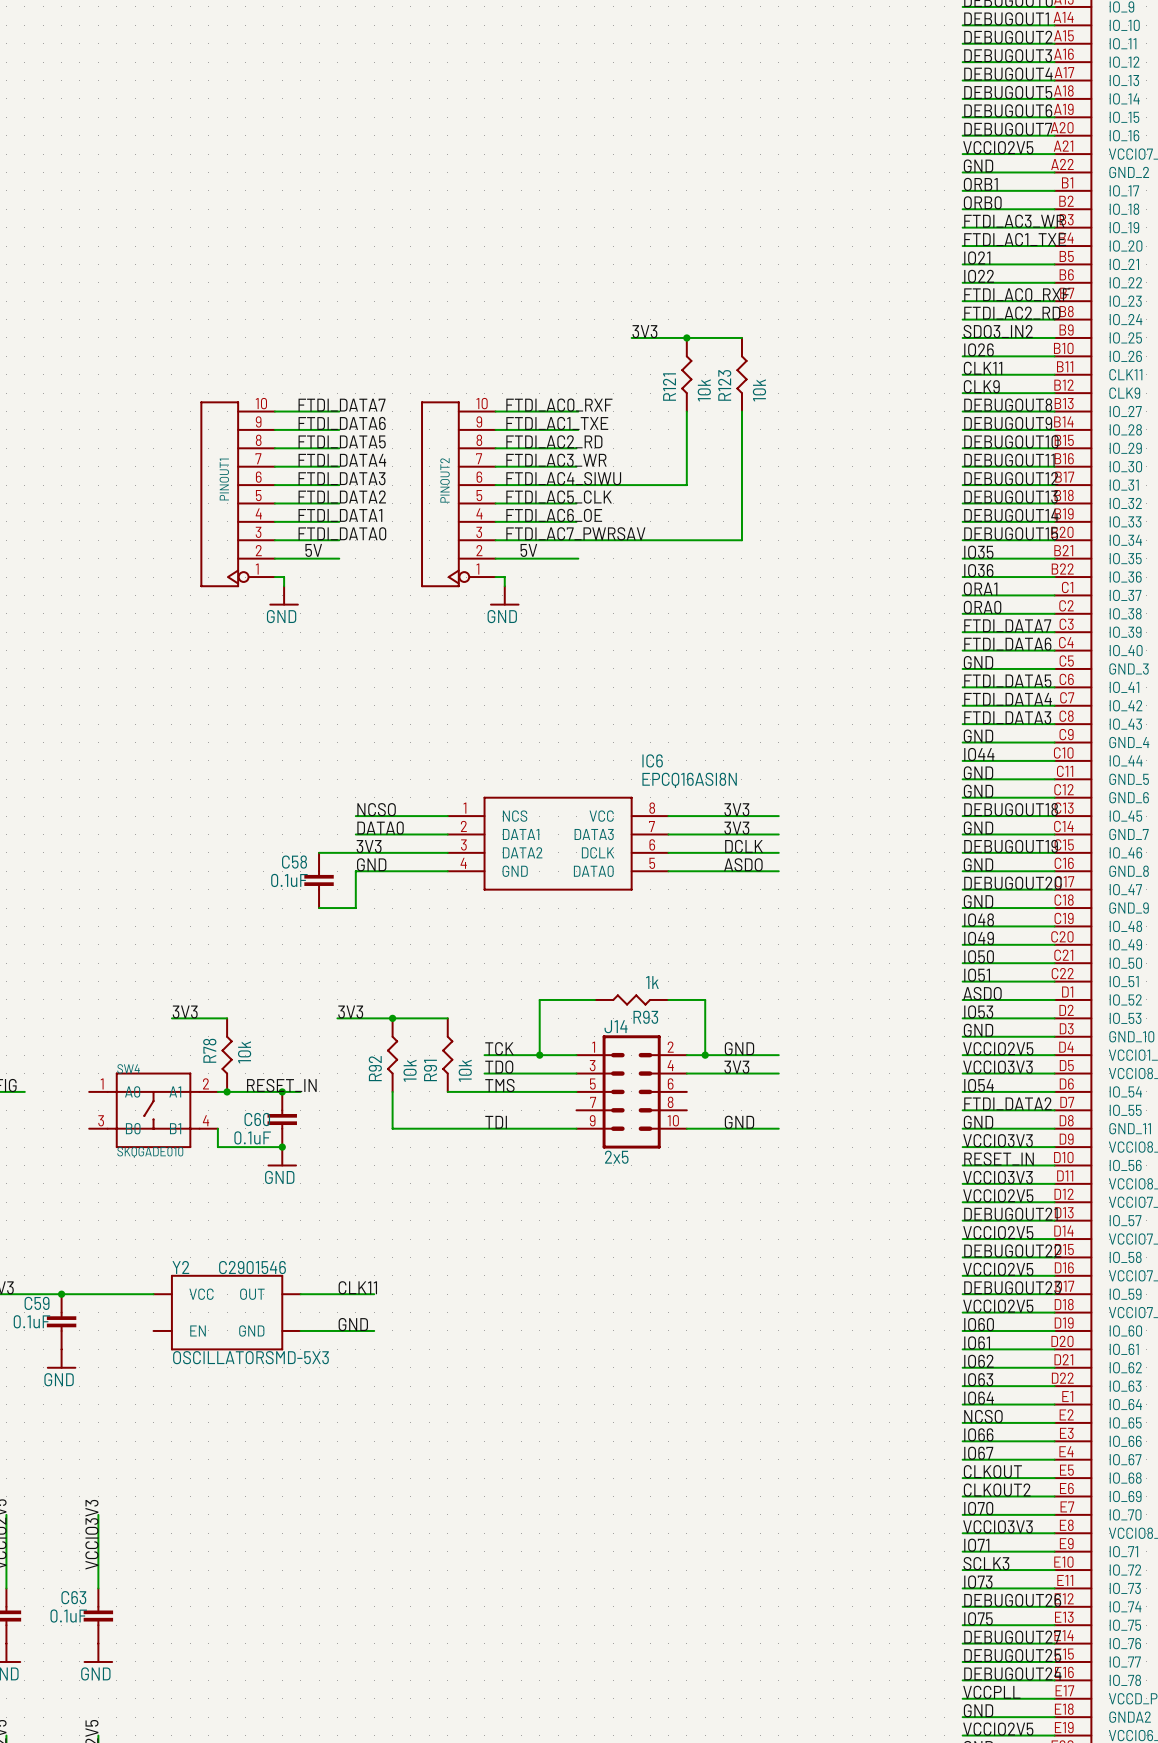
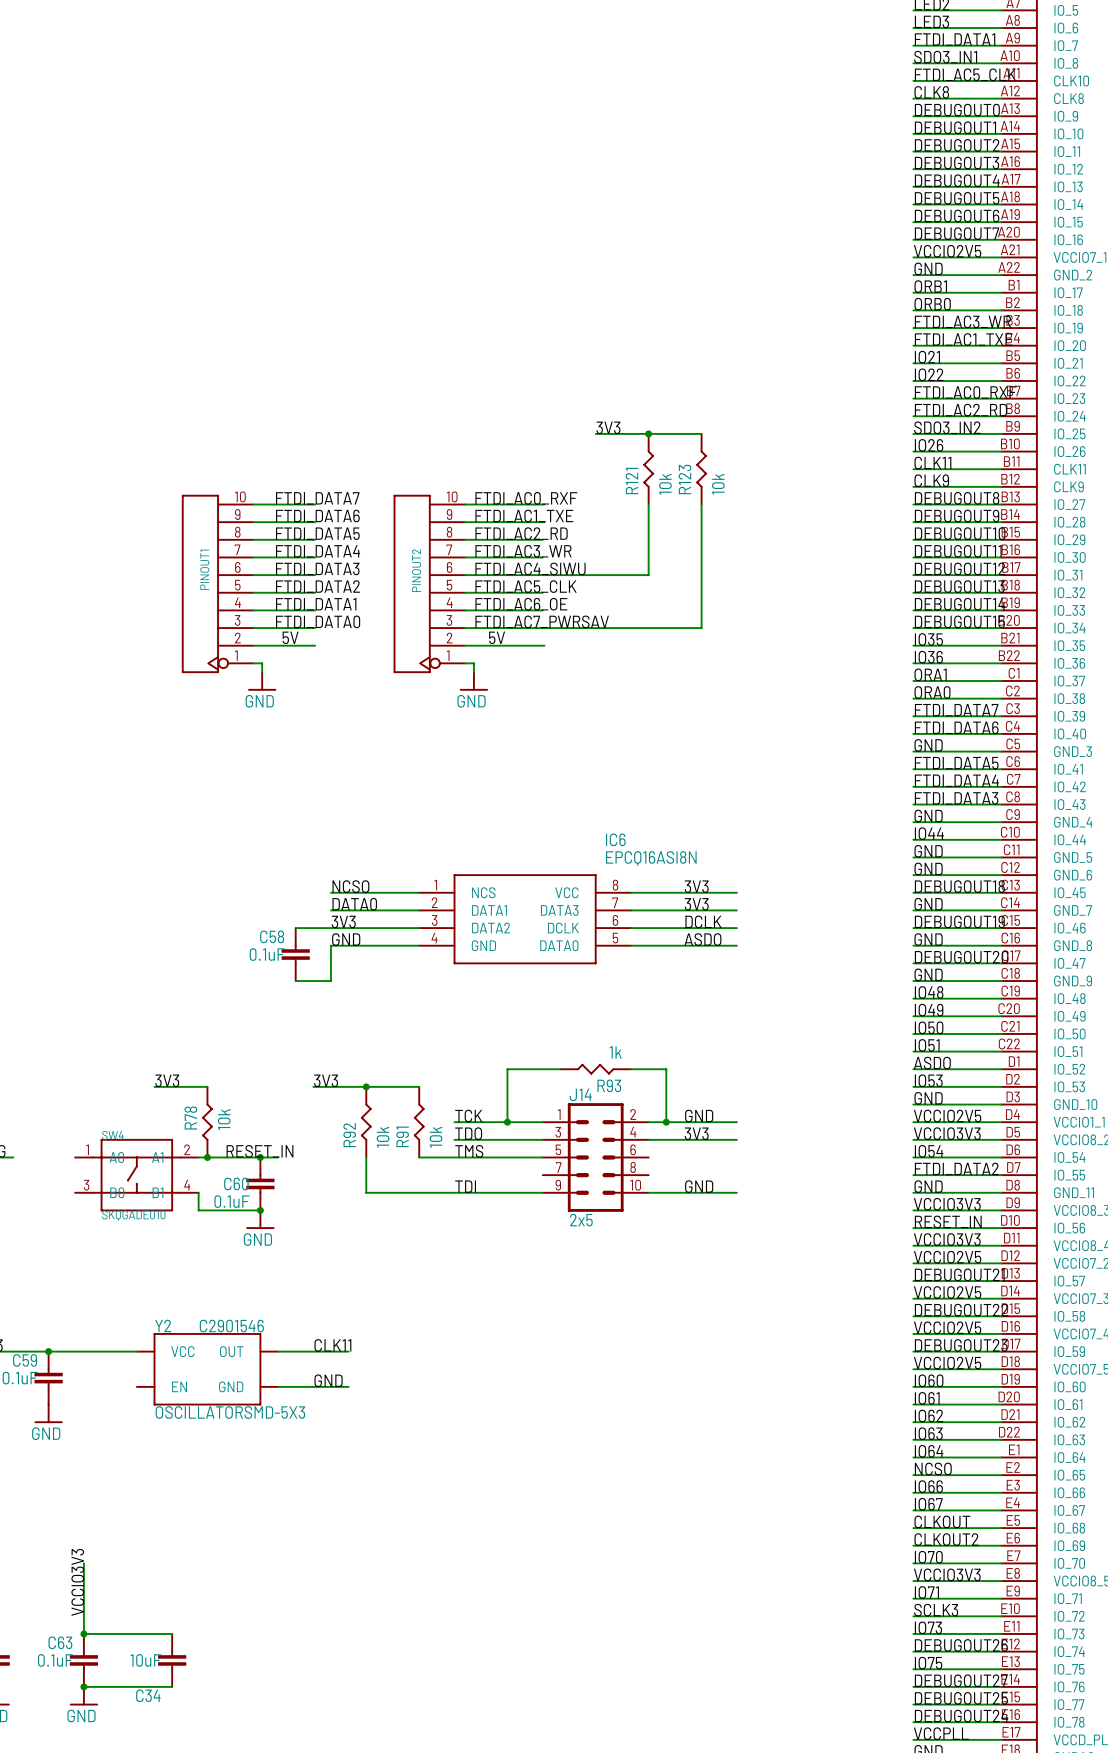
wire: none -> (83, 1633) (172, 1633)
junction: none -> (83, 1633)
C34: none -> 10uF (172, 1660)
wire: none -> (83, 1686) (172, 1686)
junction: none -> (83, 1686)

